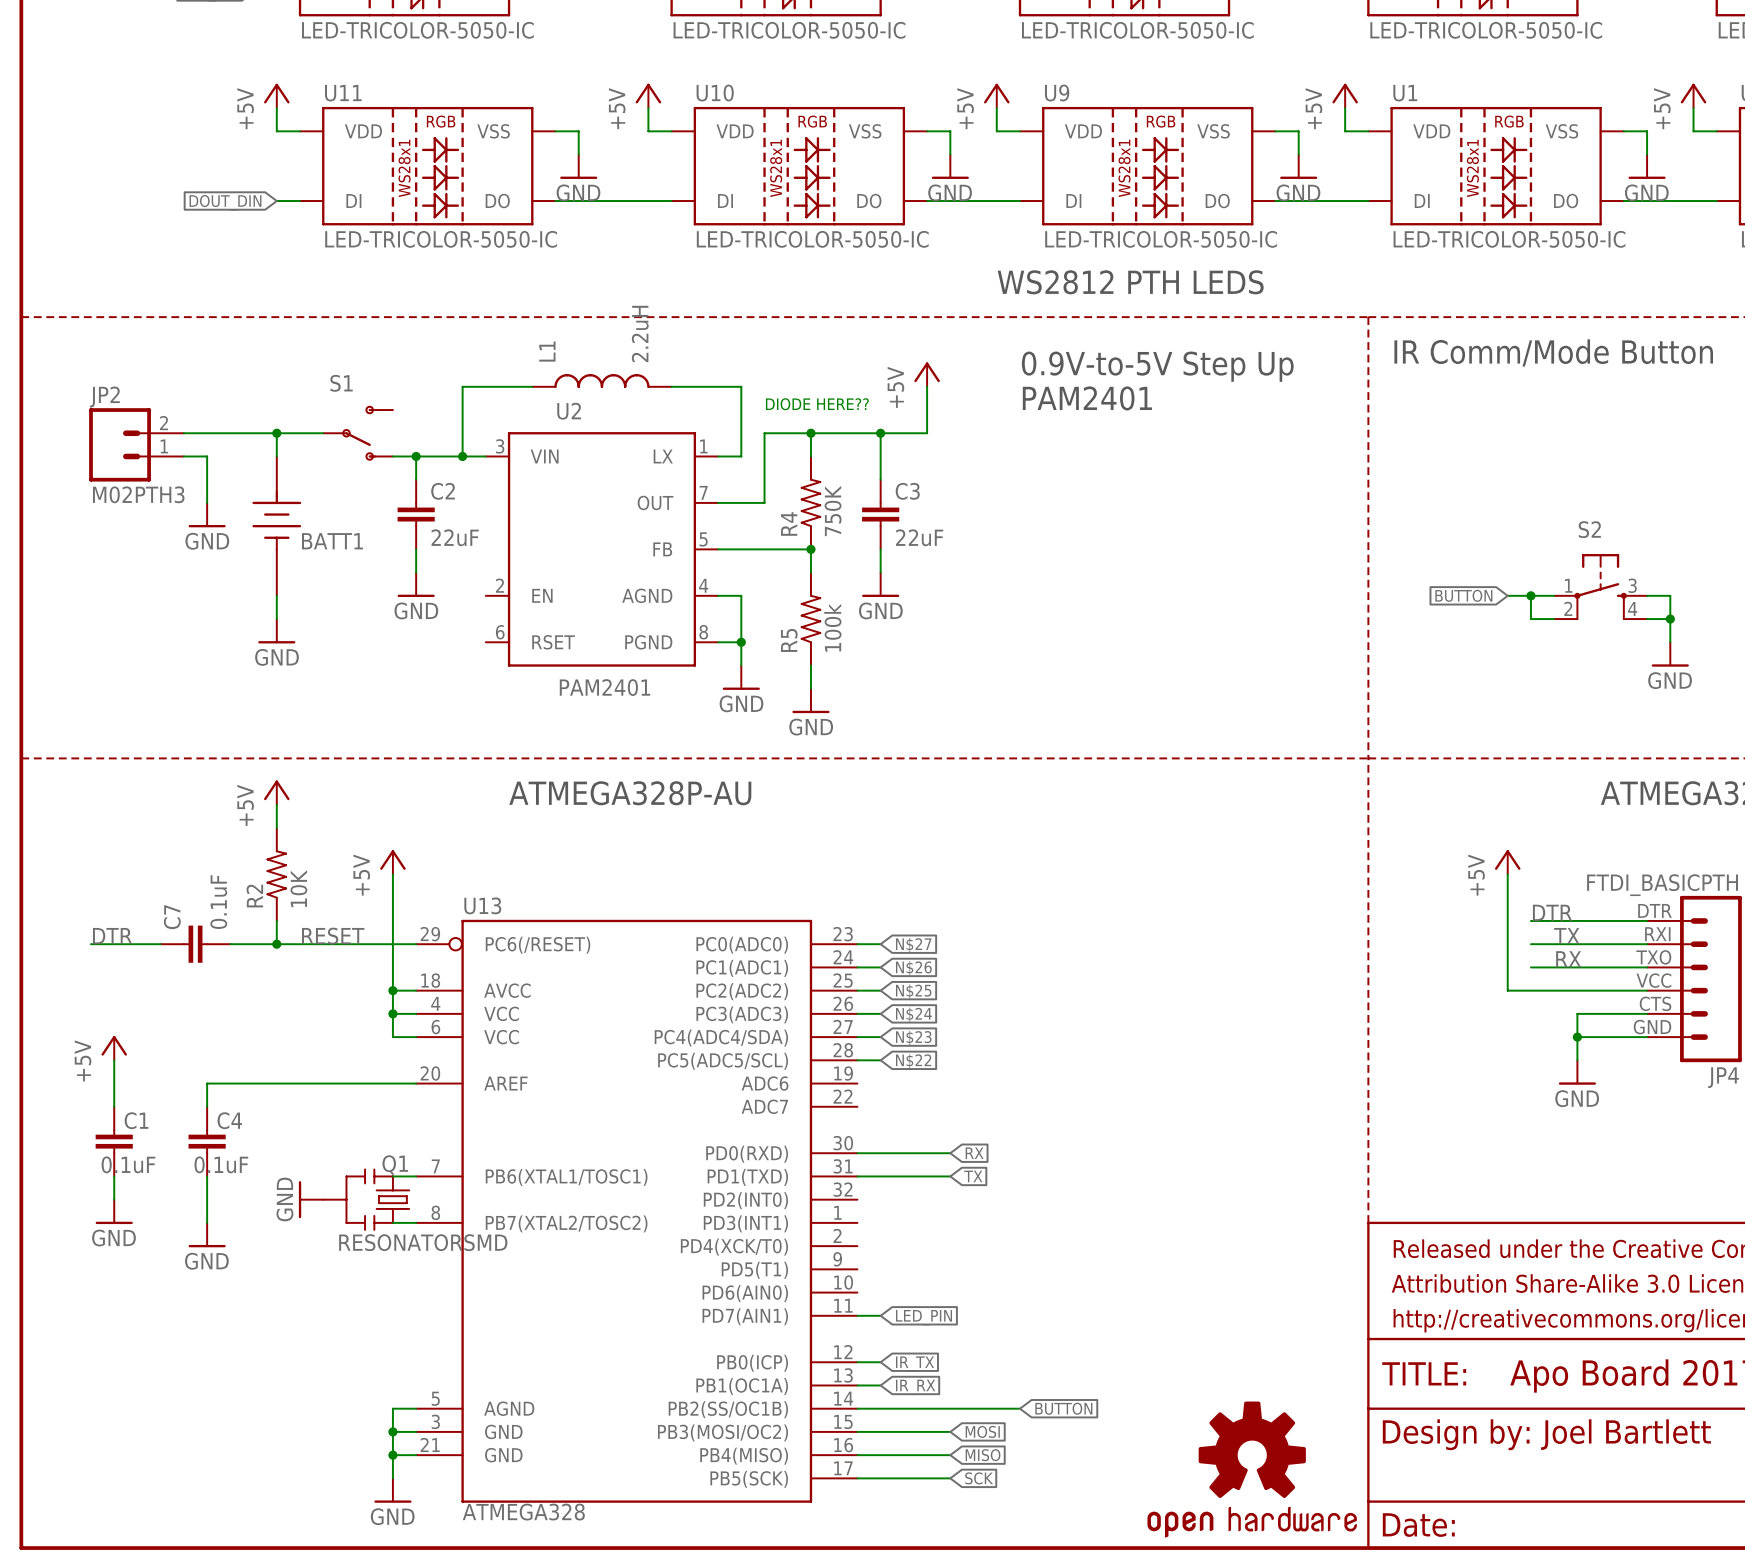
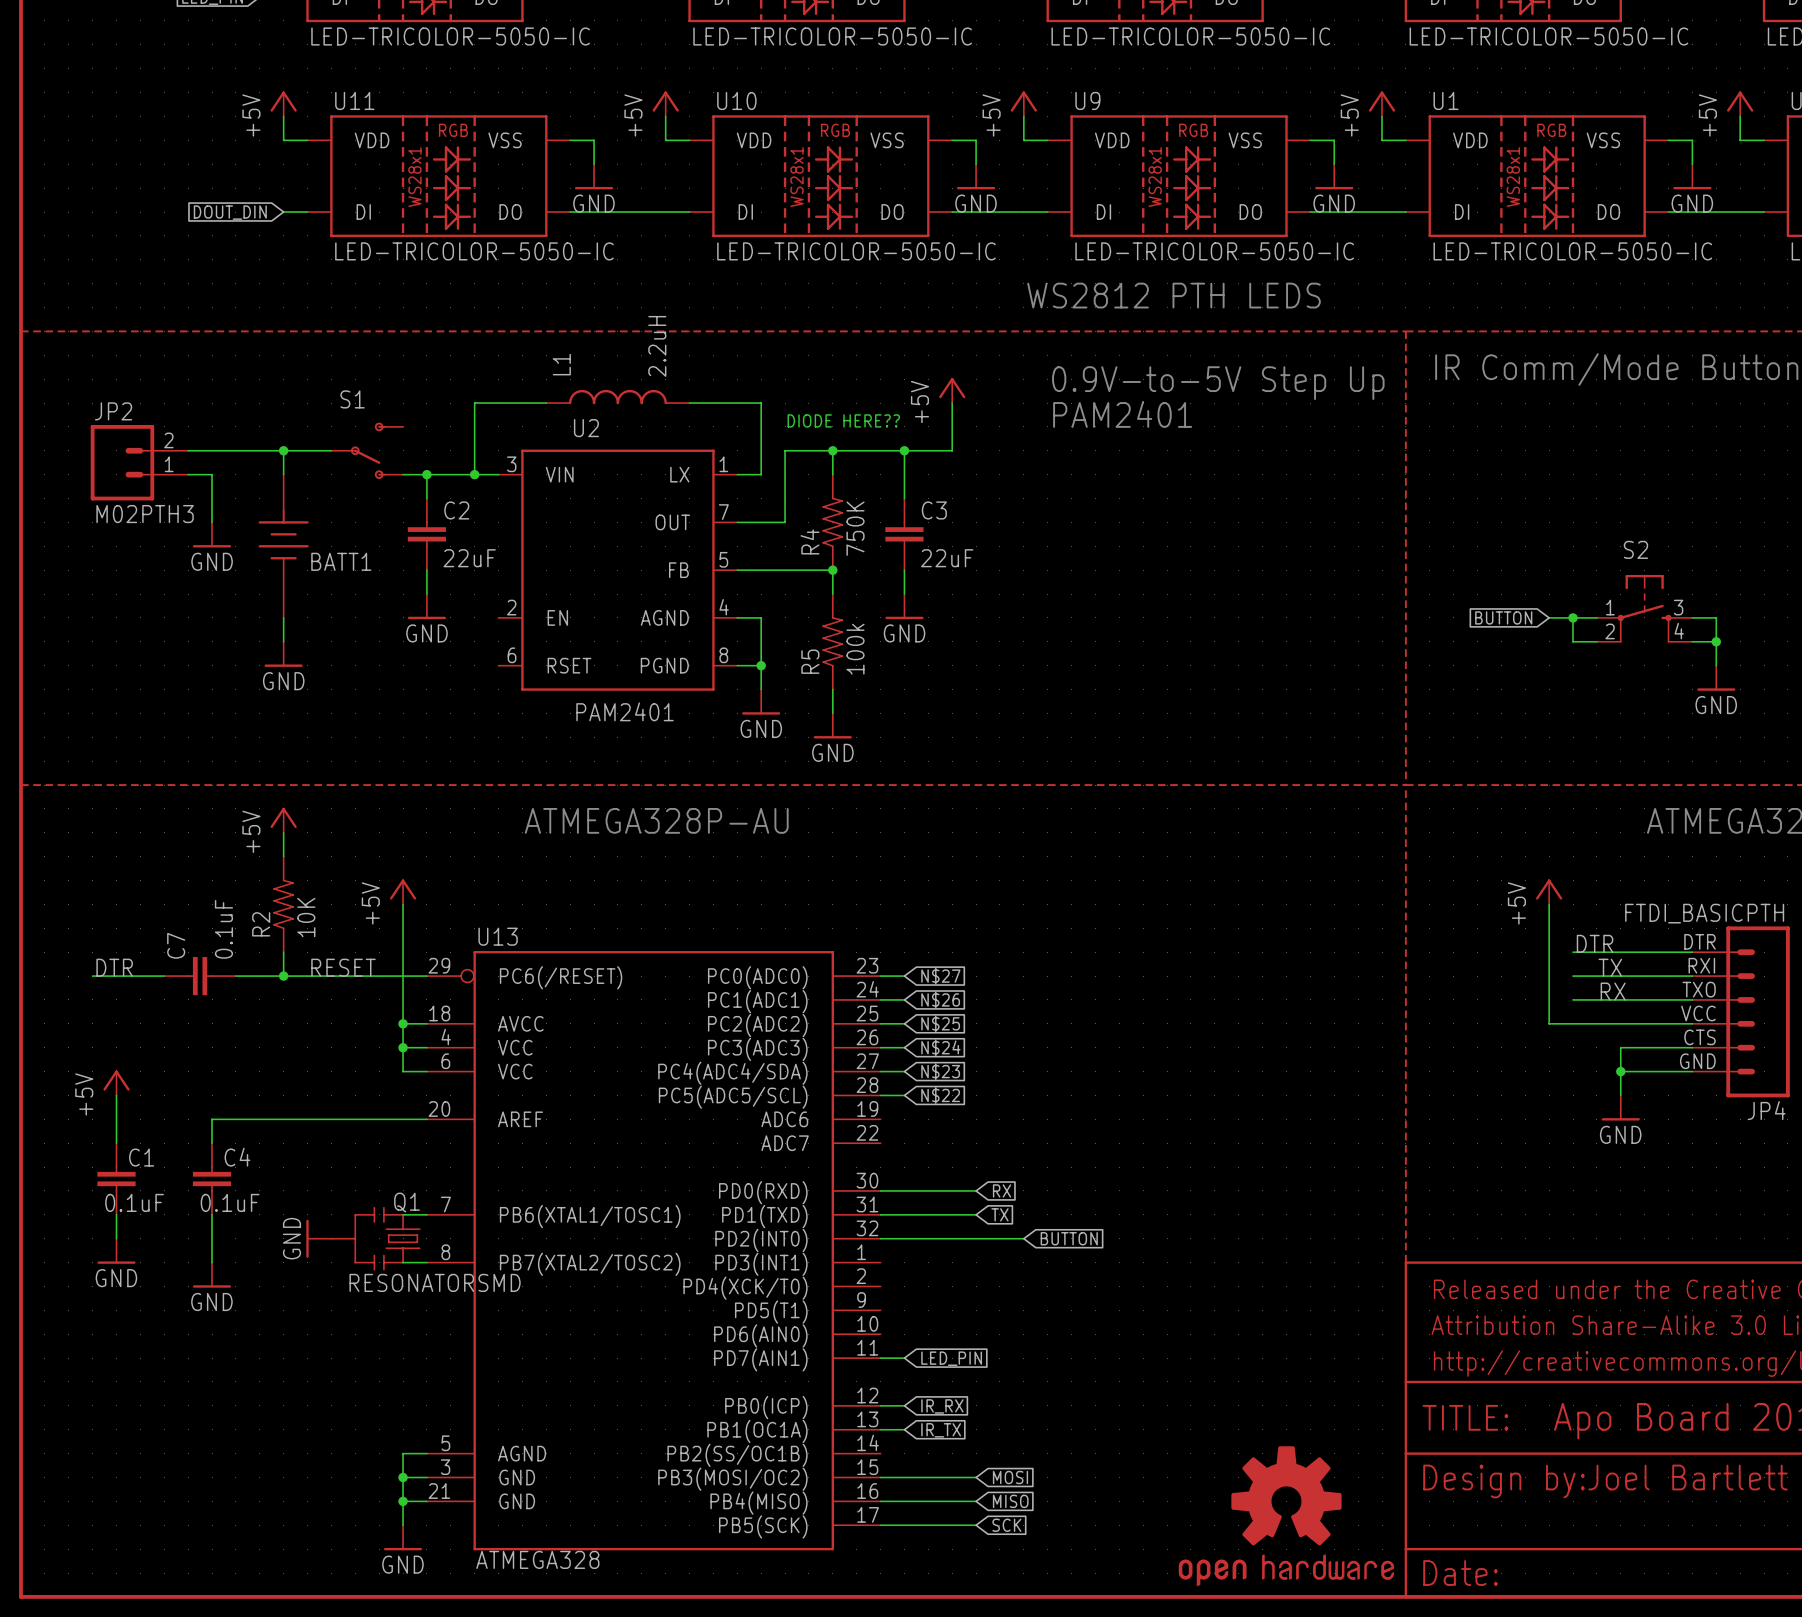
wire: none -> (880, 1238) (1023, 1238)
global label: IR_TX (915, 1364) -> IR_RX (942, 1406)
global label: IR_RX (915, 1387) -> IR_TX (941, 1430)
wire: (857, 1408) (1020, 1408) -> none
global label position: BUTTON (1063, 1408) -> BUTTON (1069, 1238)

